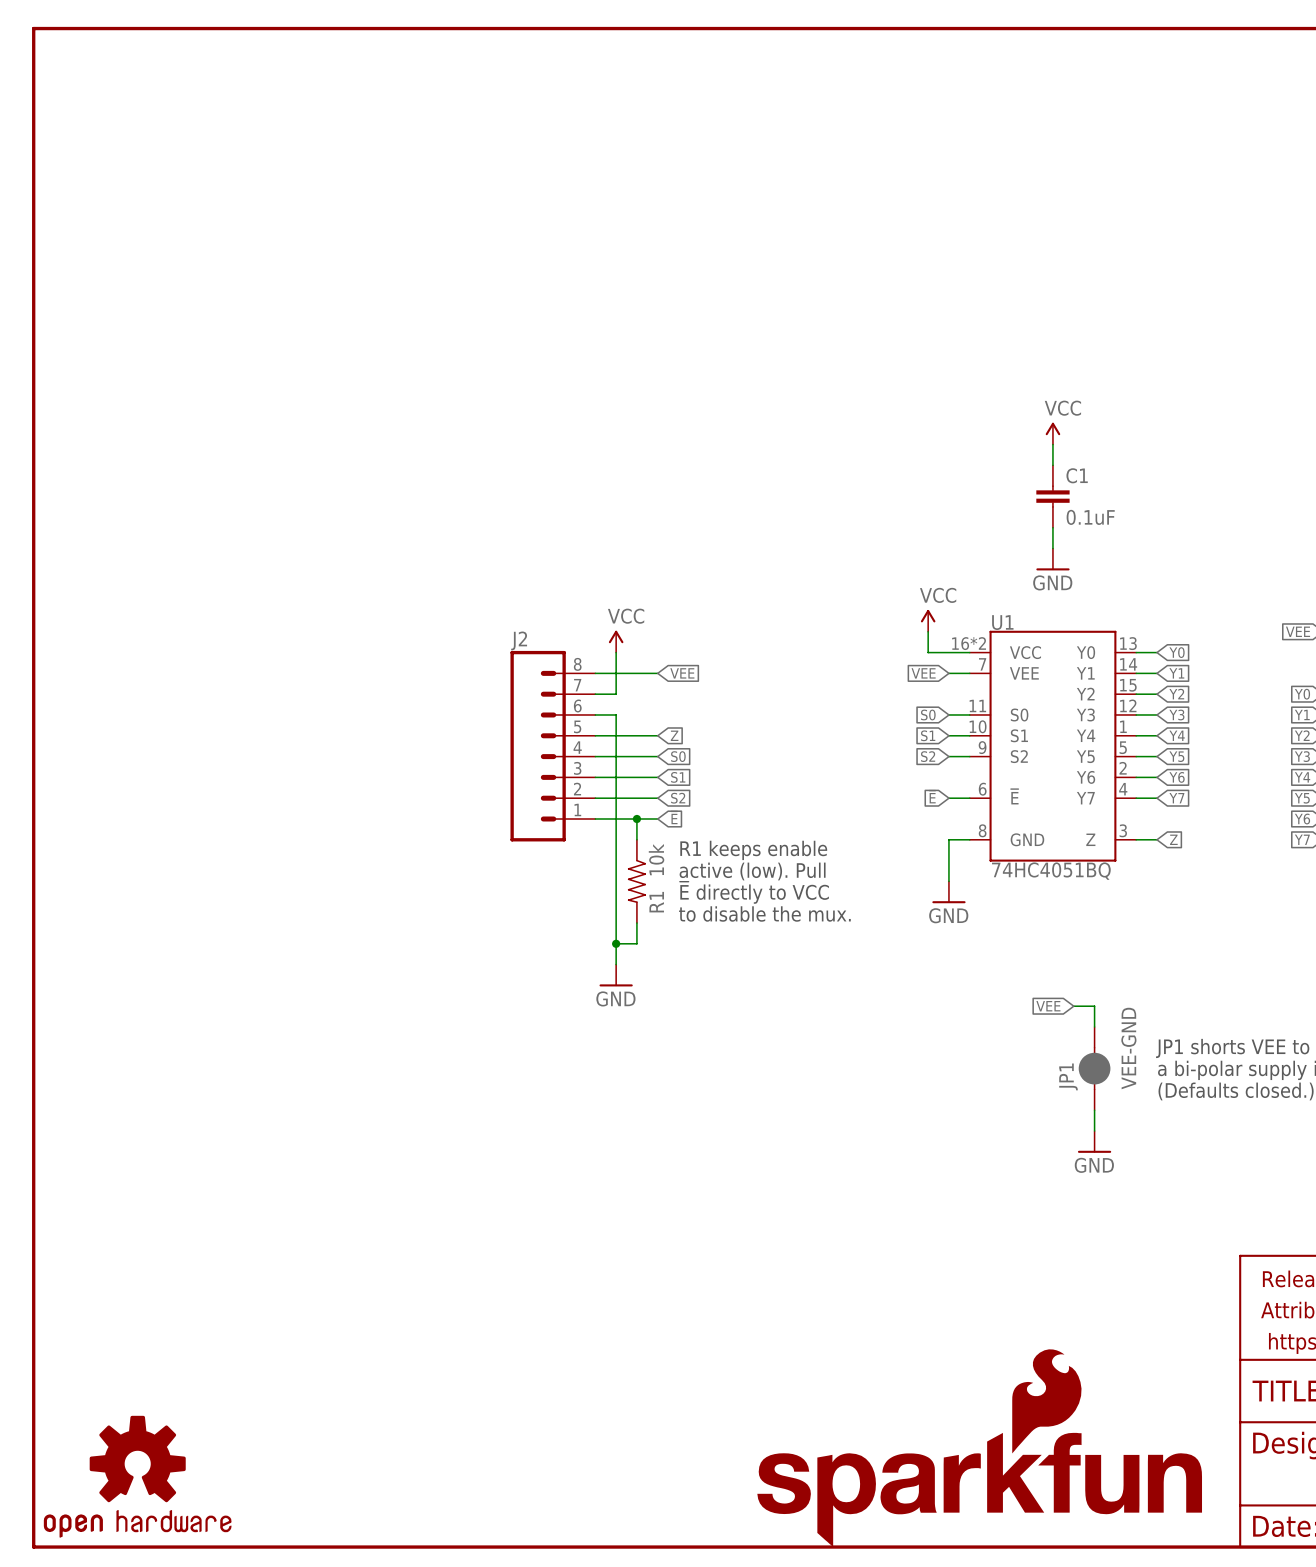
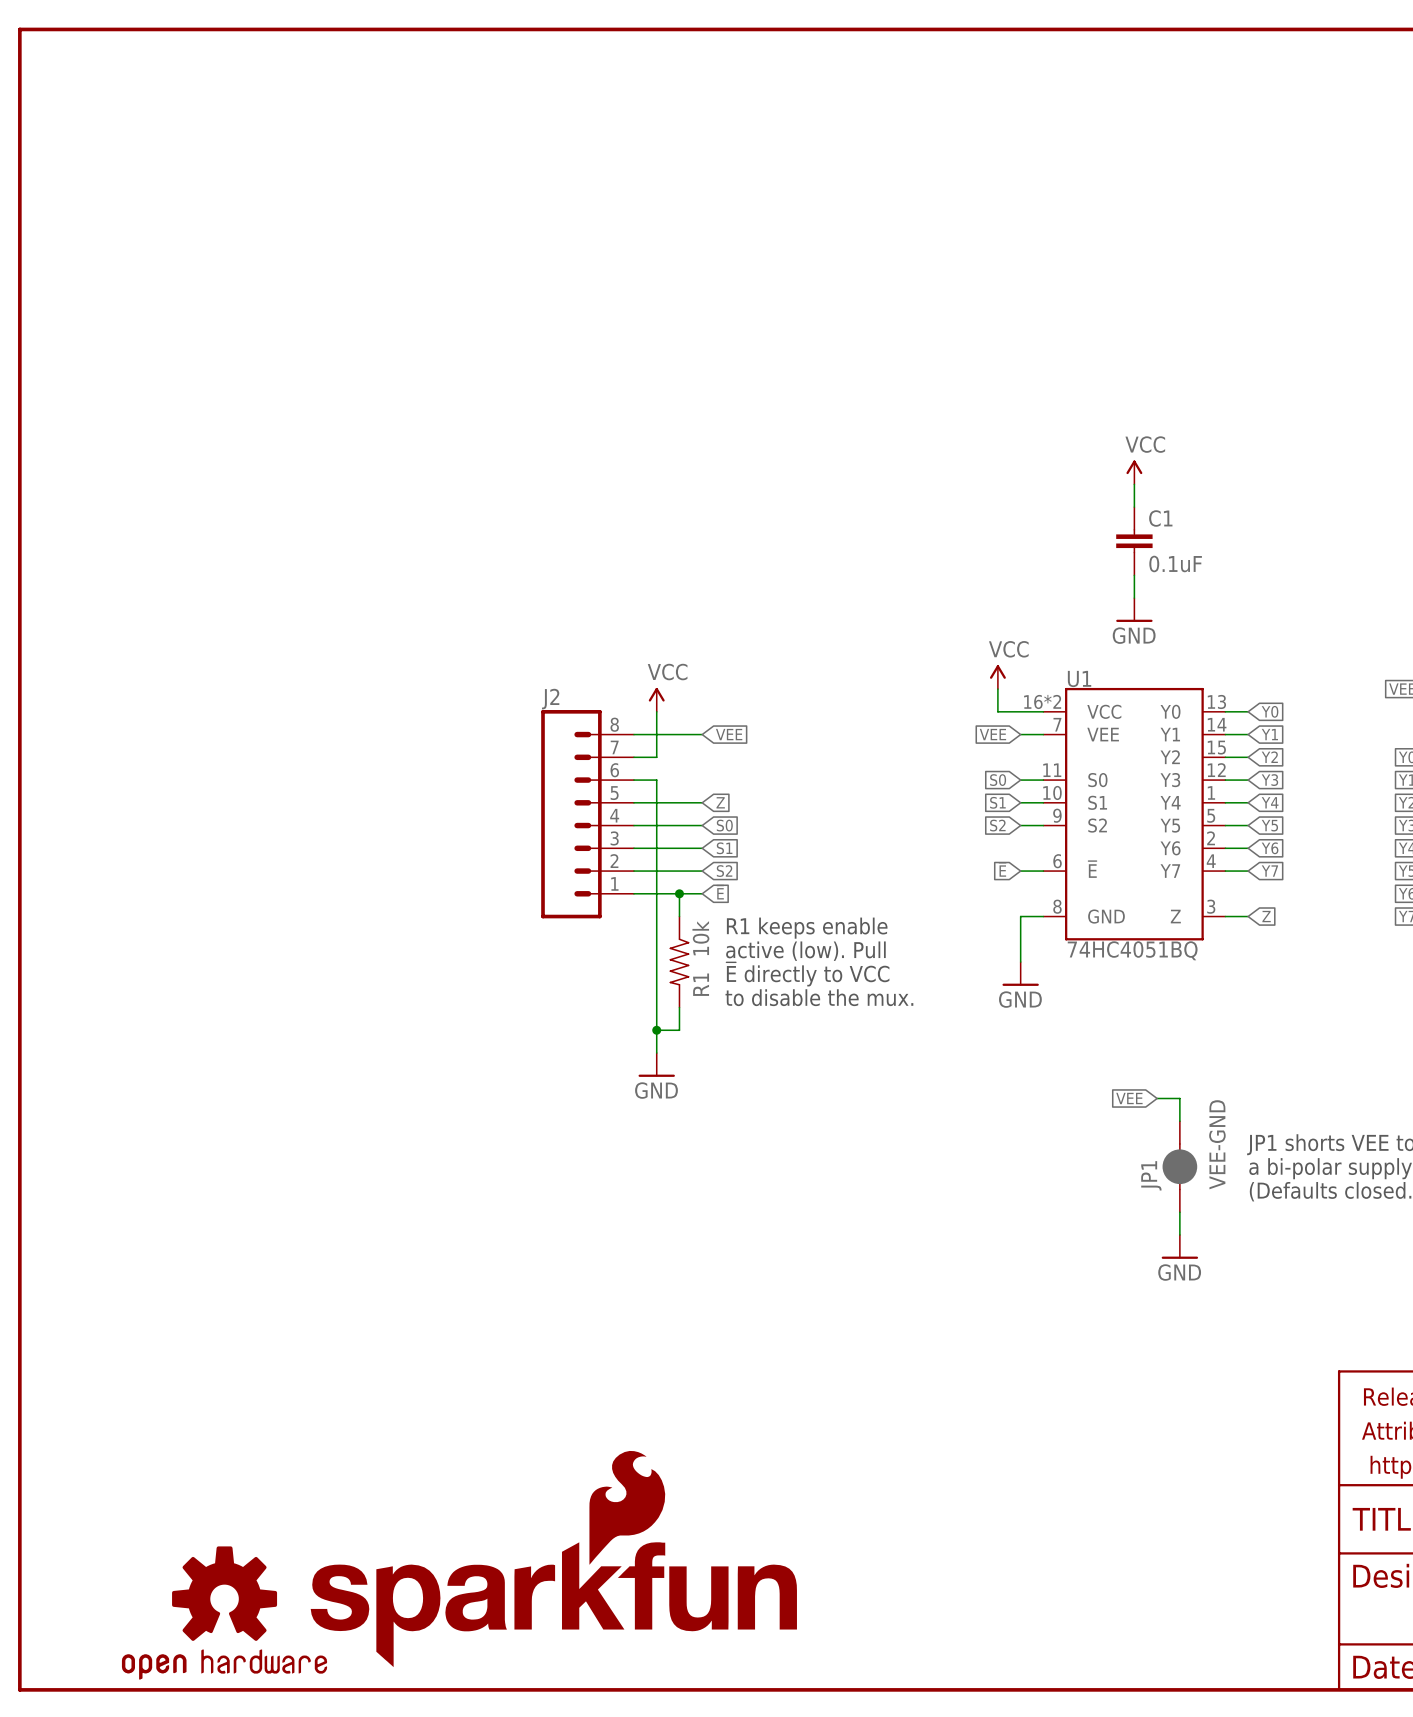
part: none -> (627, 1507)
part: (1046, 1401) -> none
part: none -> (553, 1604)
part position: (137, 1476) -> (224, 1613)
part: (979, 1489) -> none

